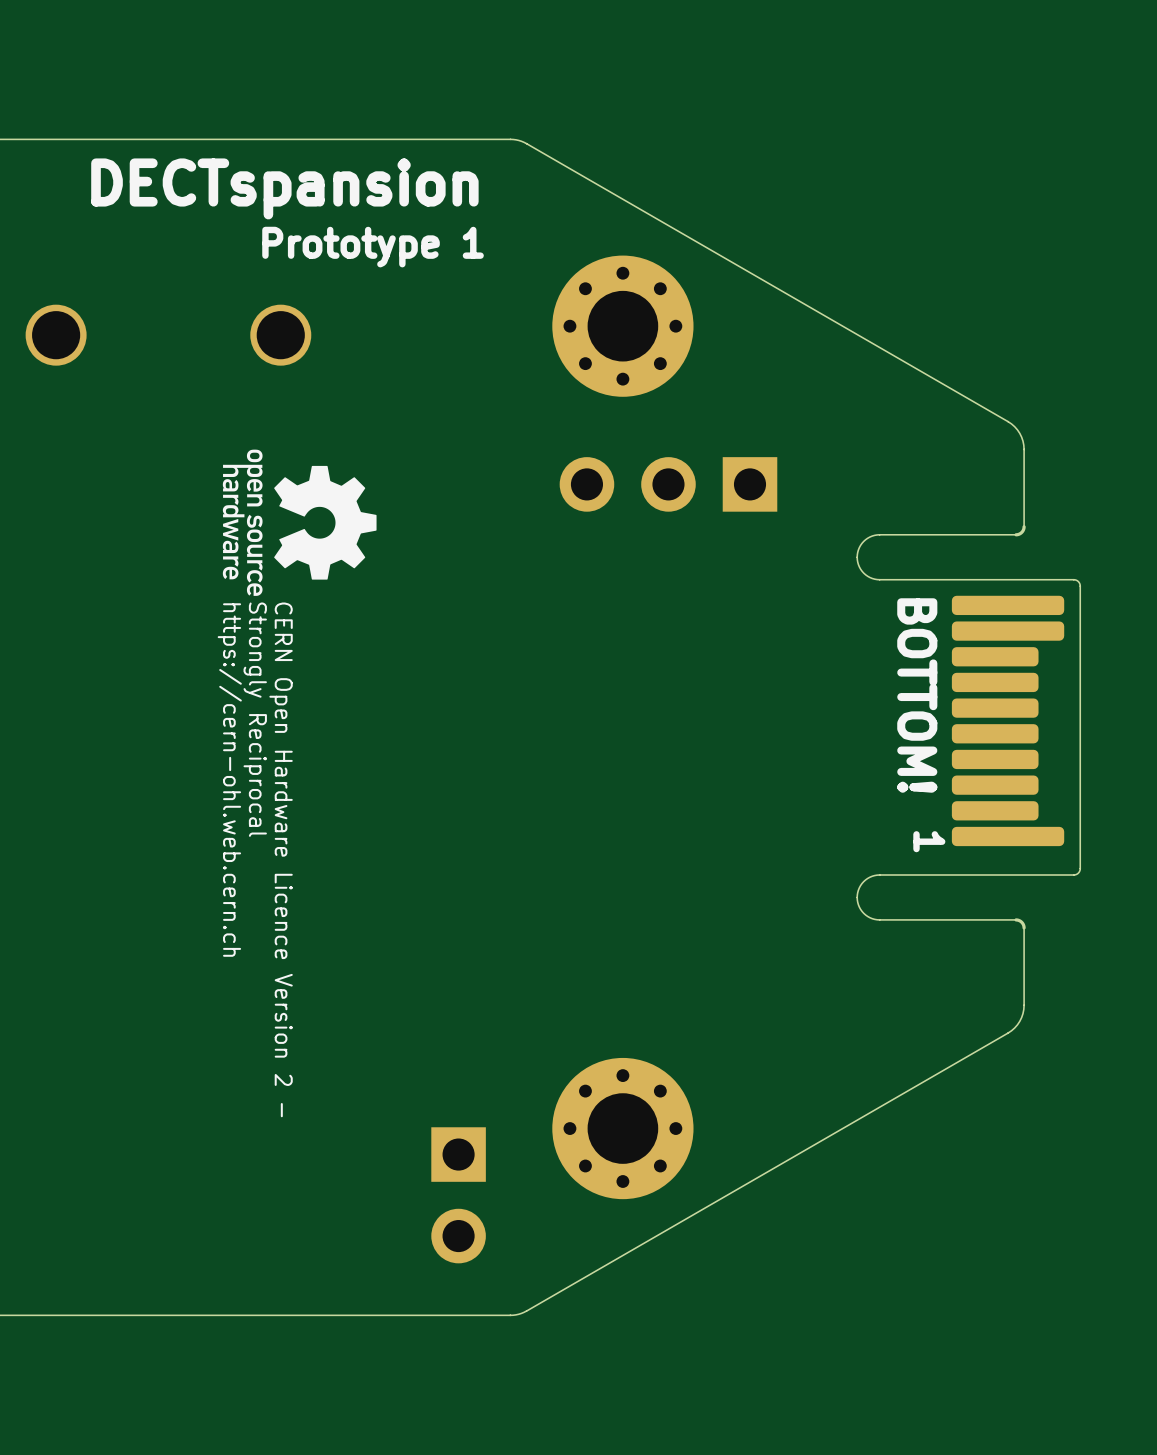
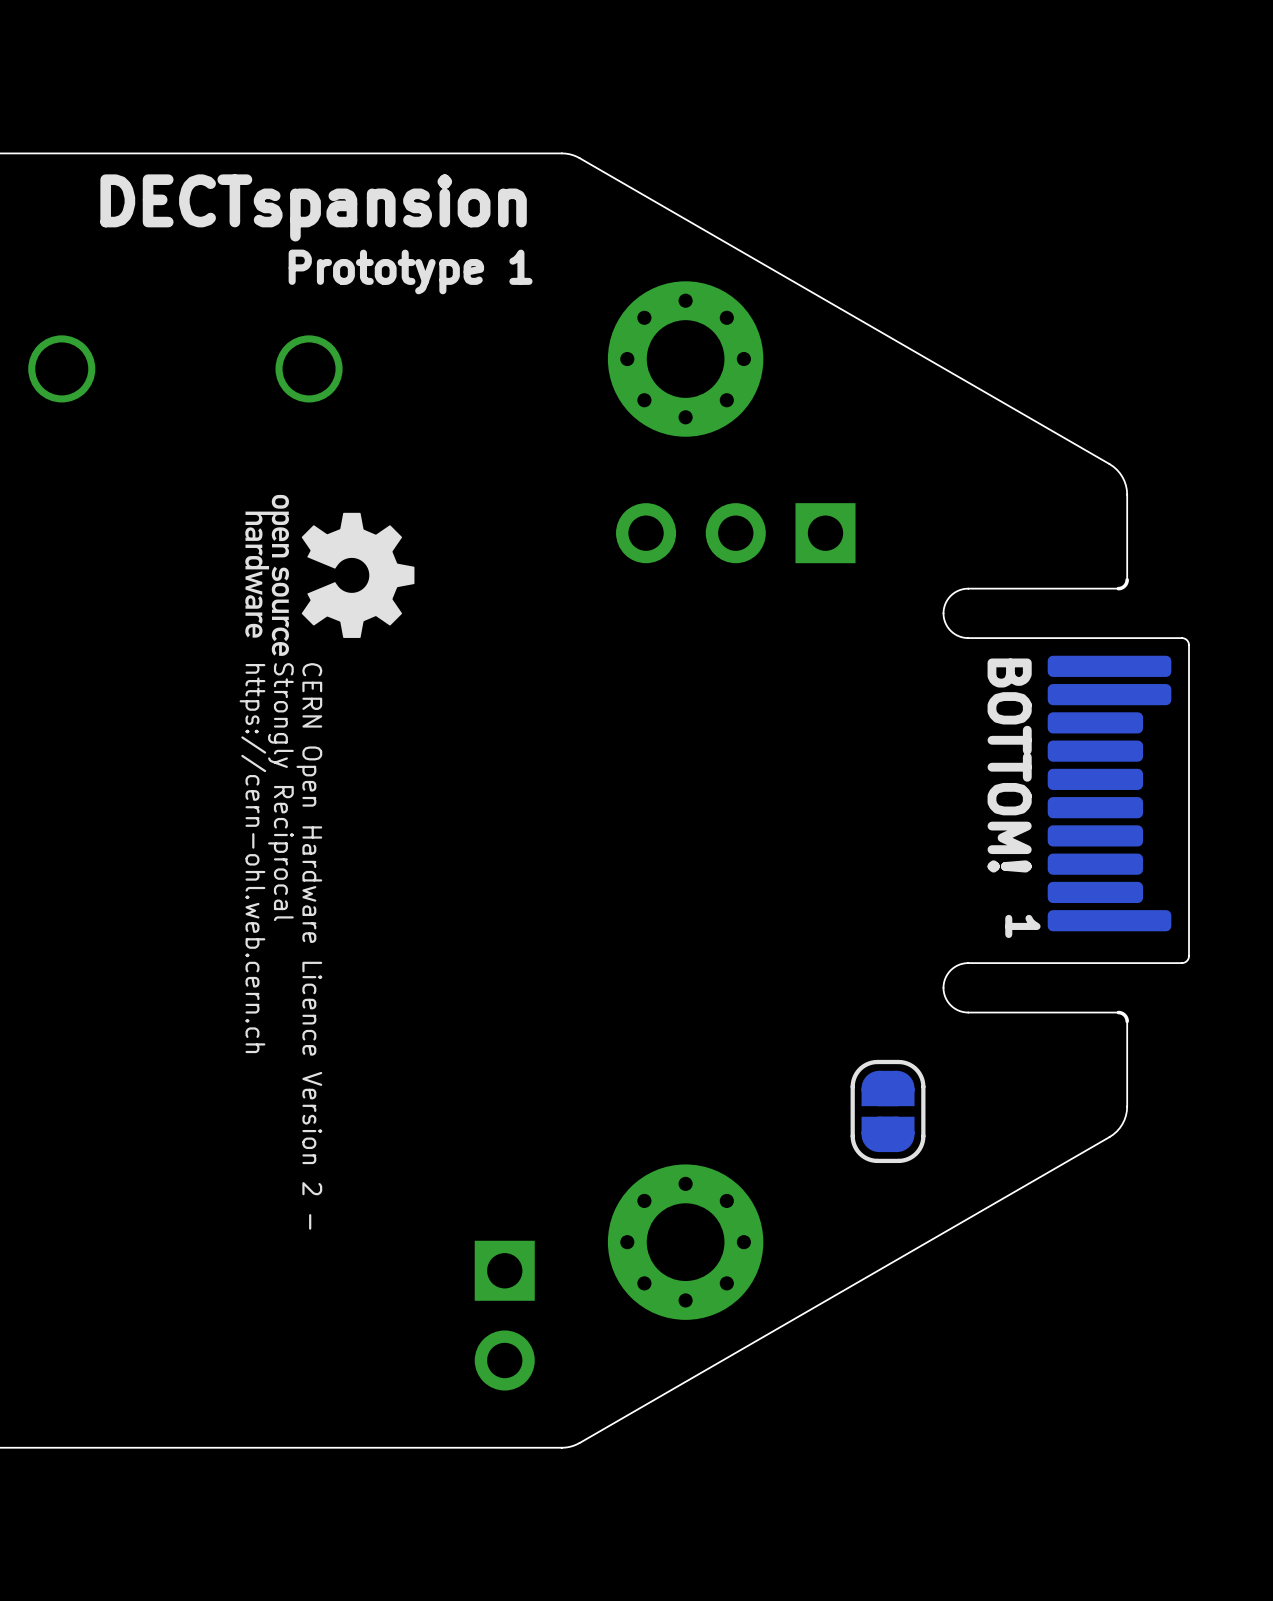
part: none -> (888, 1111)

